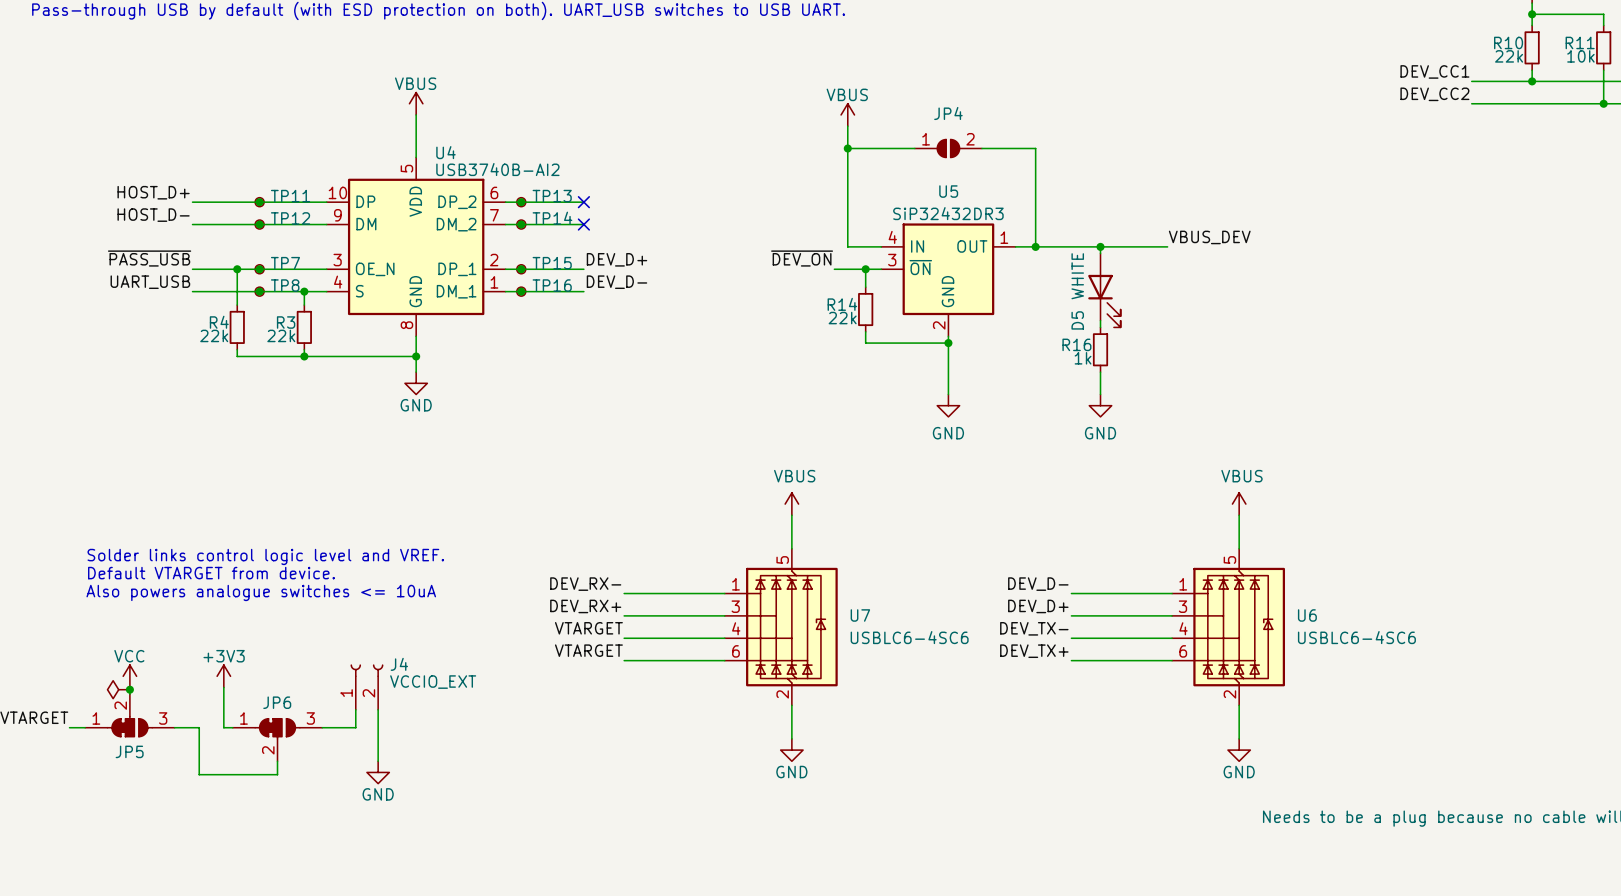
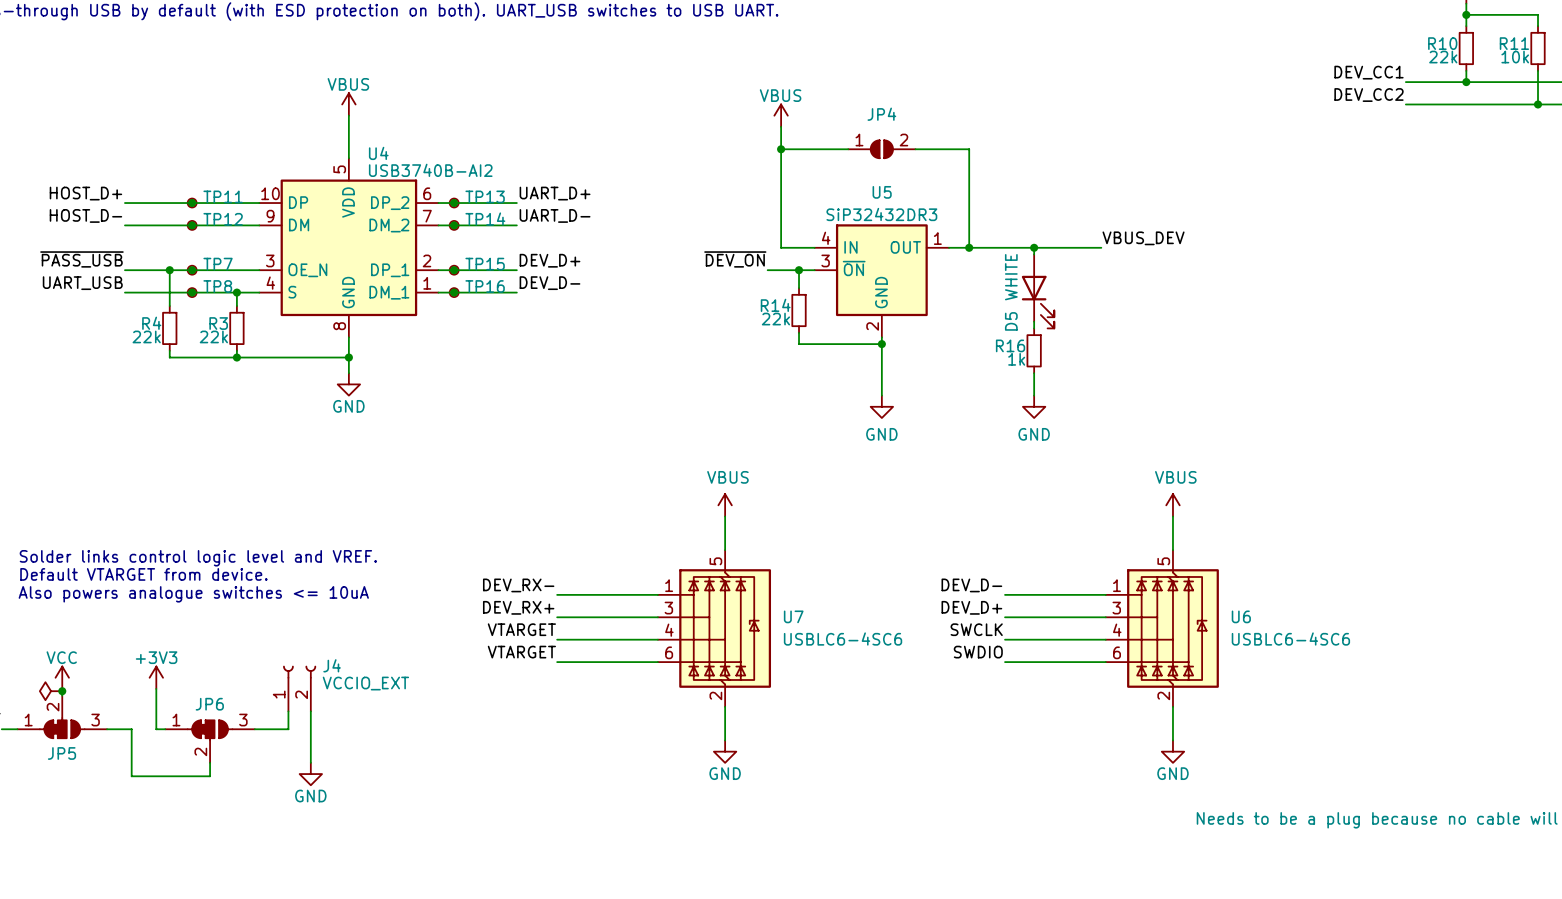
label: none -> UART_D+ (555, 193)
no-connect mark: (583, 202) -> none
label: none -> UART_D- (555, 215)
no-connect mark: (583, 224) -> none
label: DEV_TX- (1034, 628) -> SWCLK (976, 629)
label: DEV_TX+ (1034, 651) -> SWDIO (978, 652)

